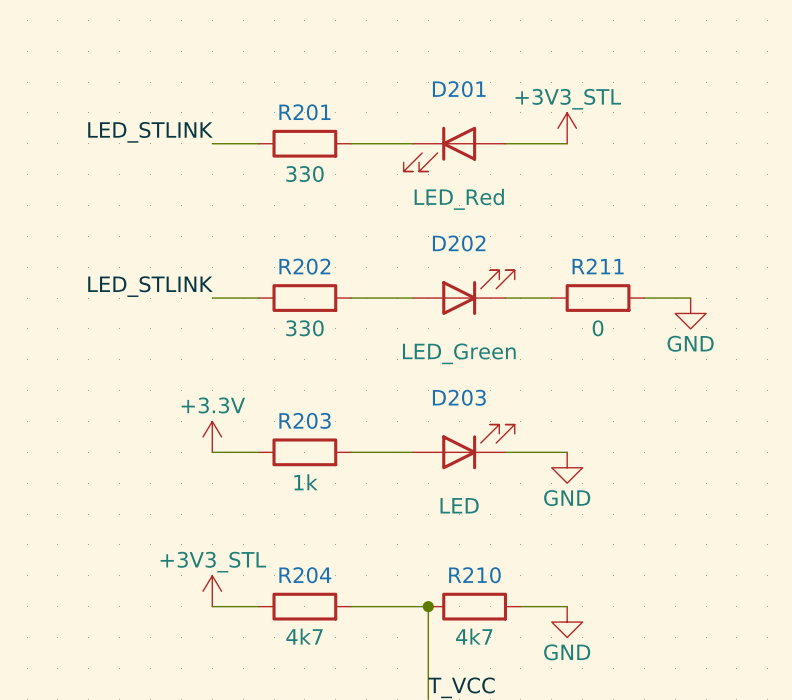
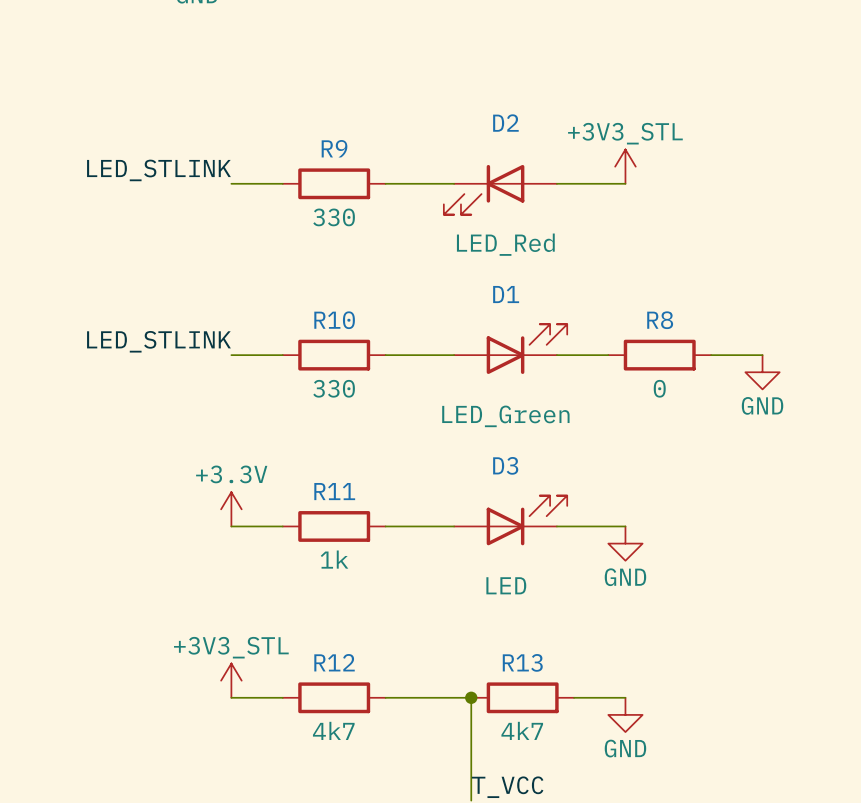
D201 name: D201 (459, 89) -> D2 (505, 123)
R201 name: R201 (304, 112) -> R9 (334, 148)
D202 name: D202 (459, 243) -> D1 (506, 294)
R202 name: R202 (304, 266) -> R10 (334, 320)
R211 name: R211 (598, 266) -> R8 (660, 320)
D203 name: D203 (459, 397) -> D3 (505, 465)
R203 name: R203 (305, 420) -> R11 (334, 491)
R204 name: R204 (305, 575) -> R12 (334, 662)
R210 name: R210 (474, 575) -> R13 (522, 662)

